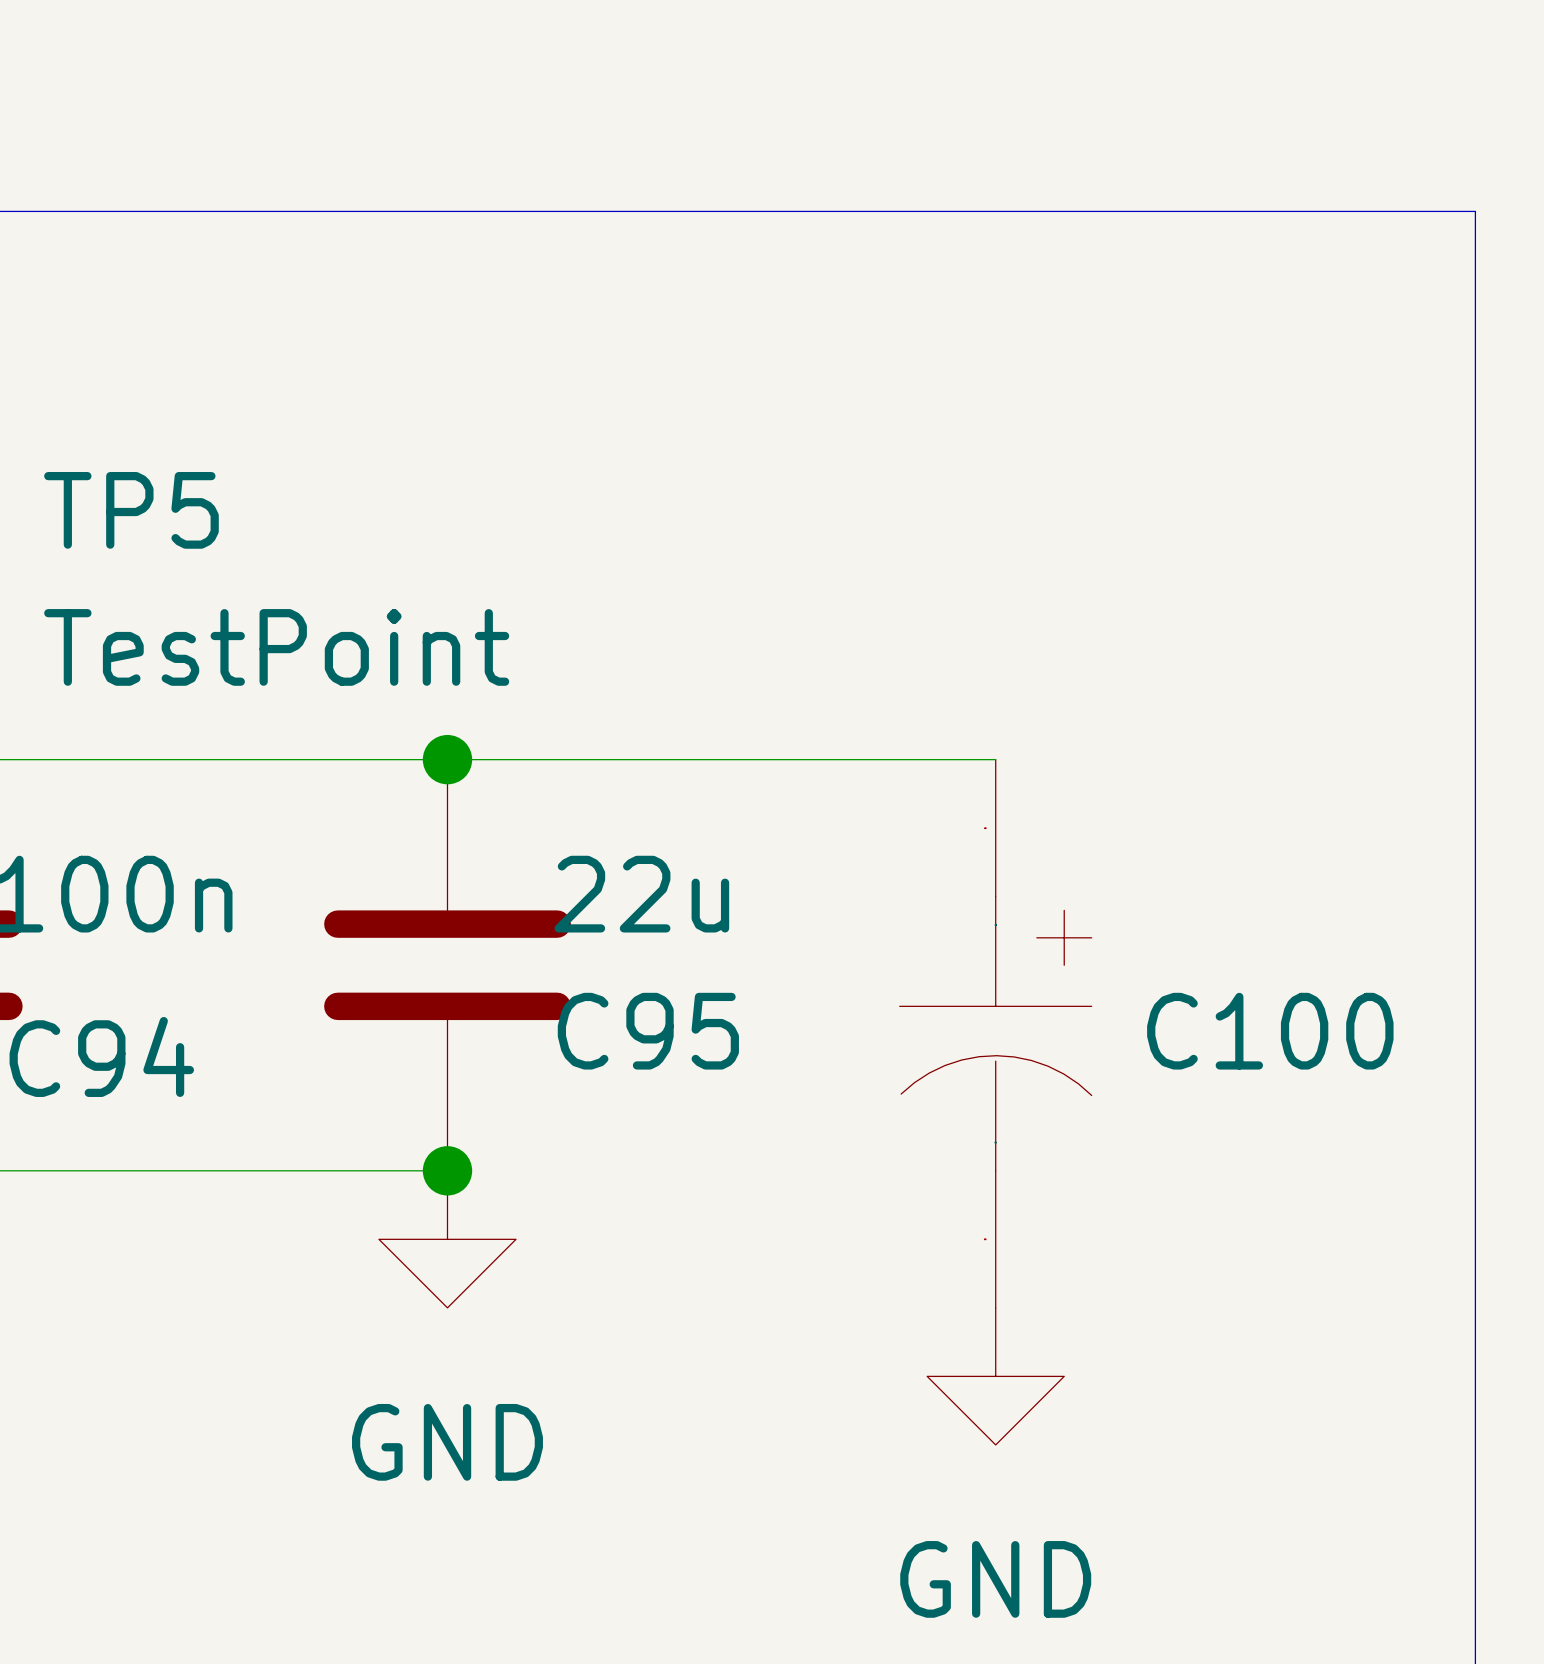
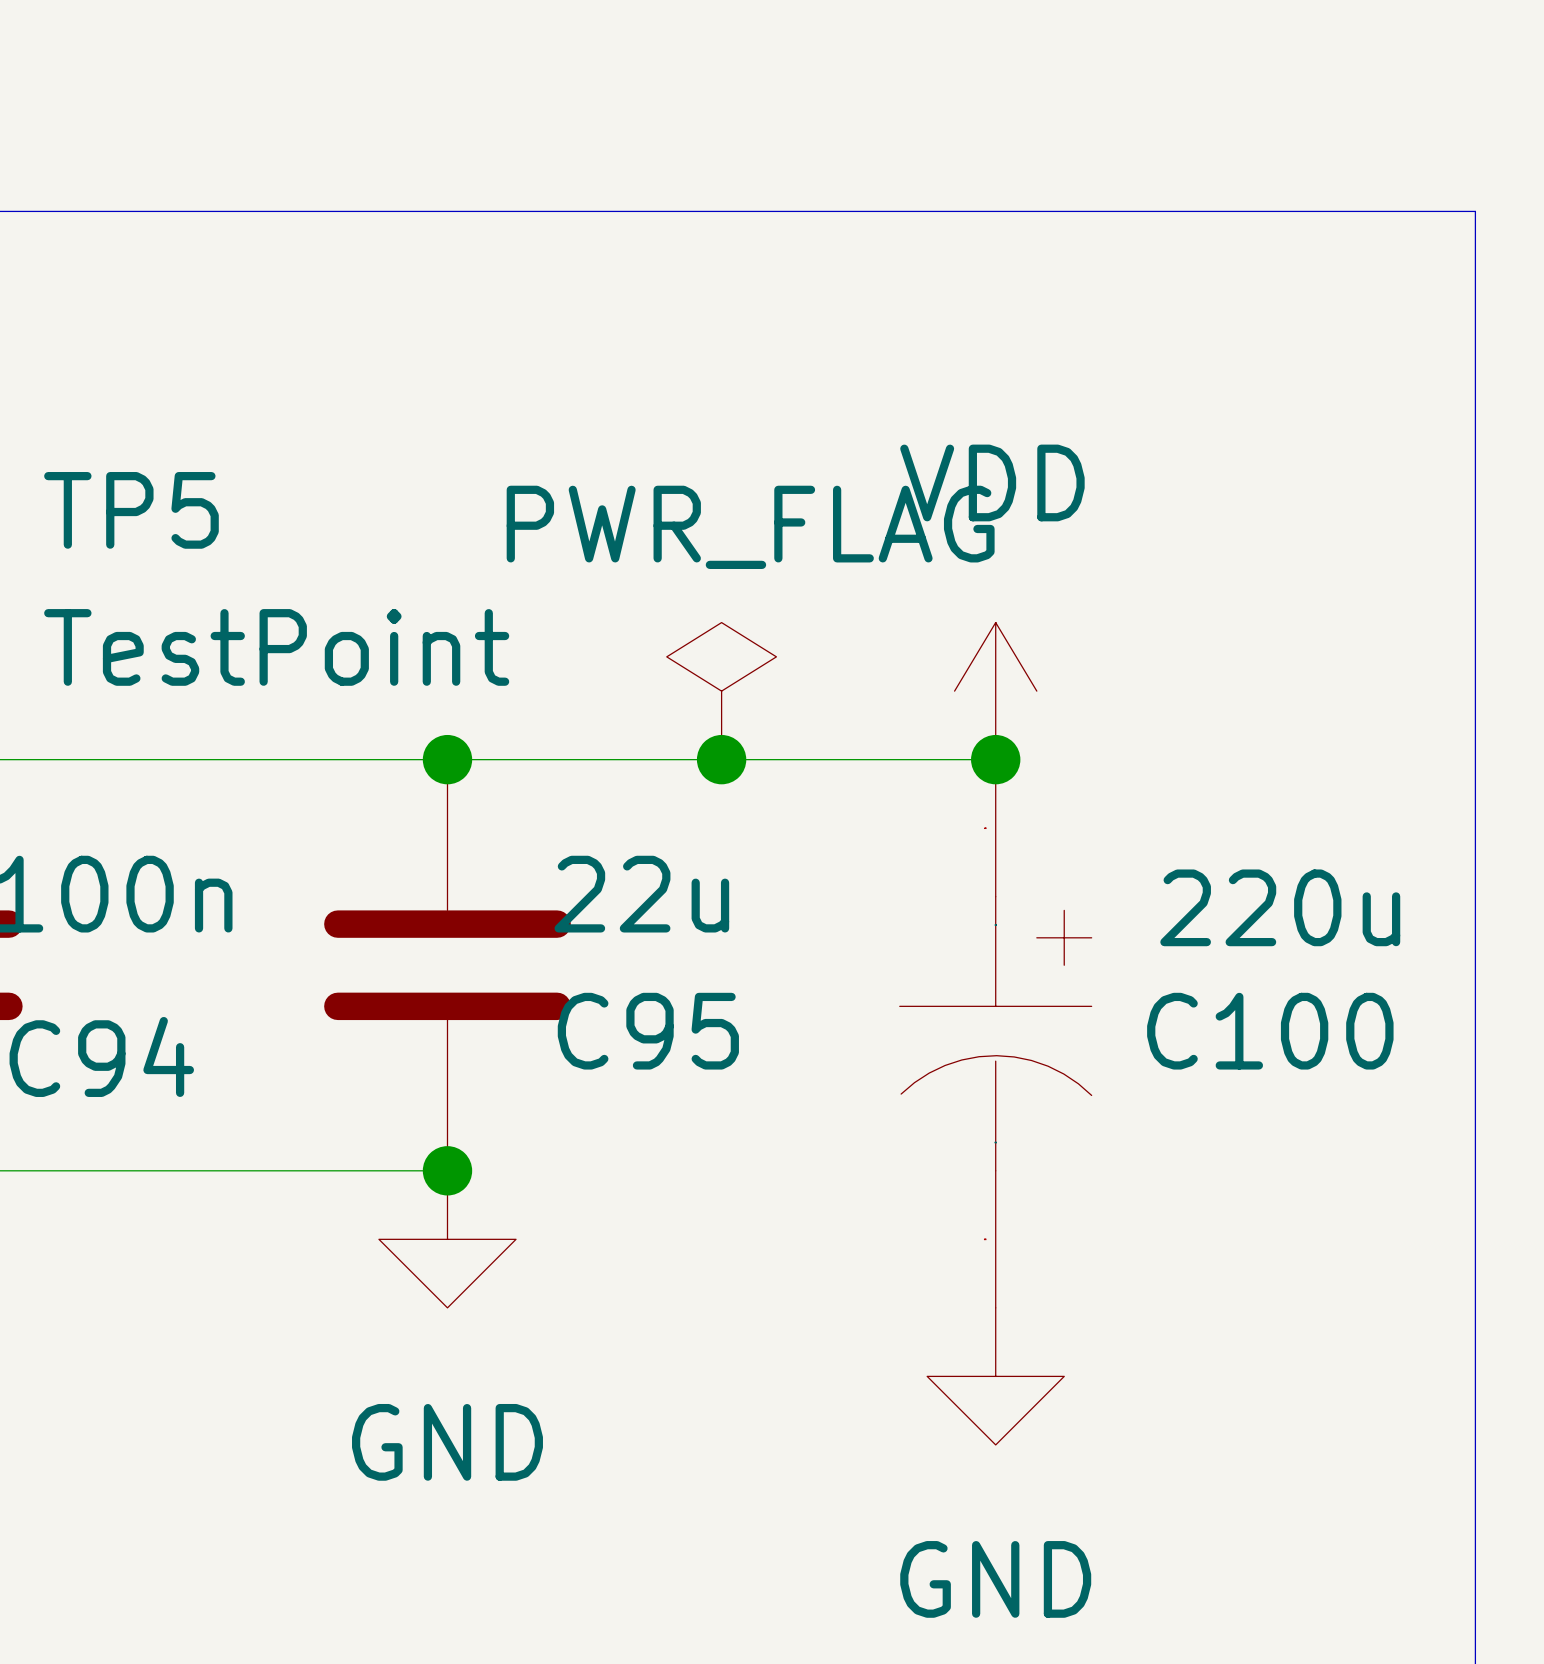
power symbol: none -> PWR_FLAG (721, 691)
power symbol: none -> VDD (995, 691)
junction: none -> (721, 759)
junction: none -> (995, 759)
C100 value: none -> 220u (1280, 907)

